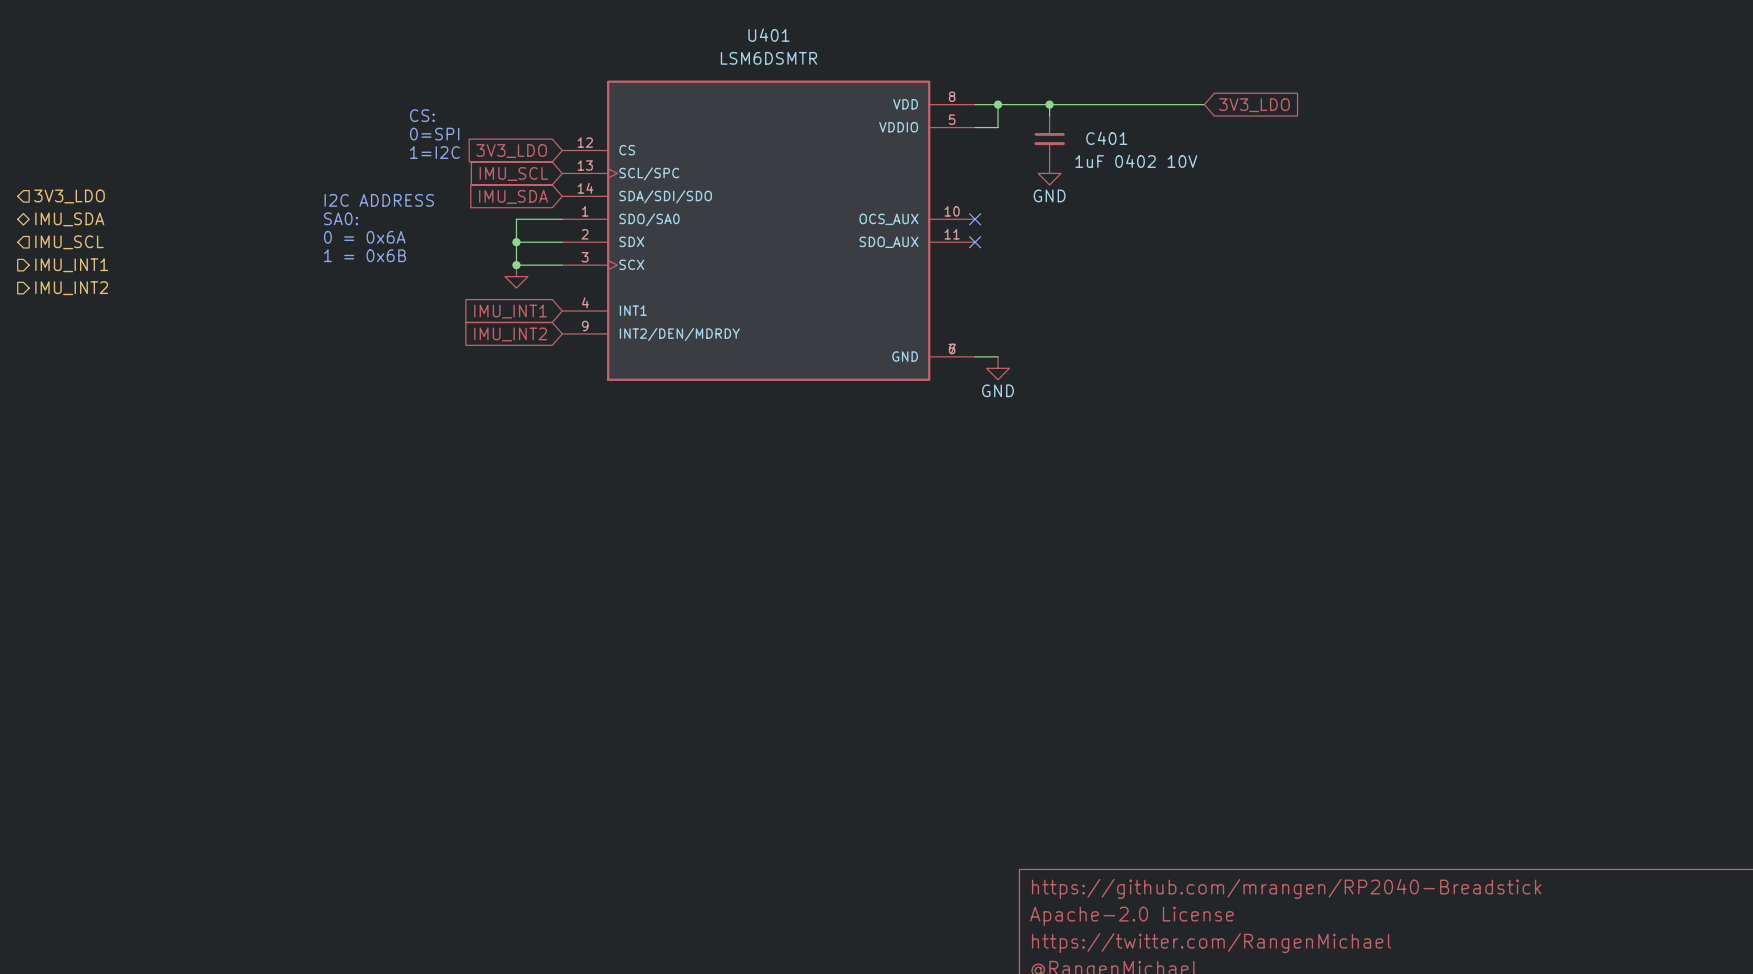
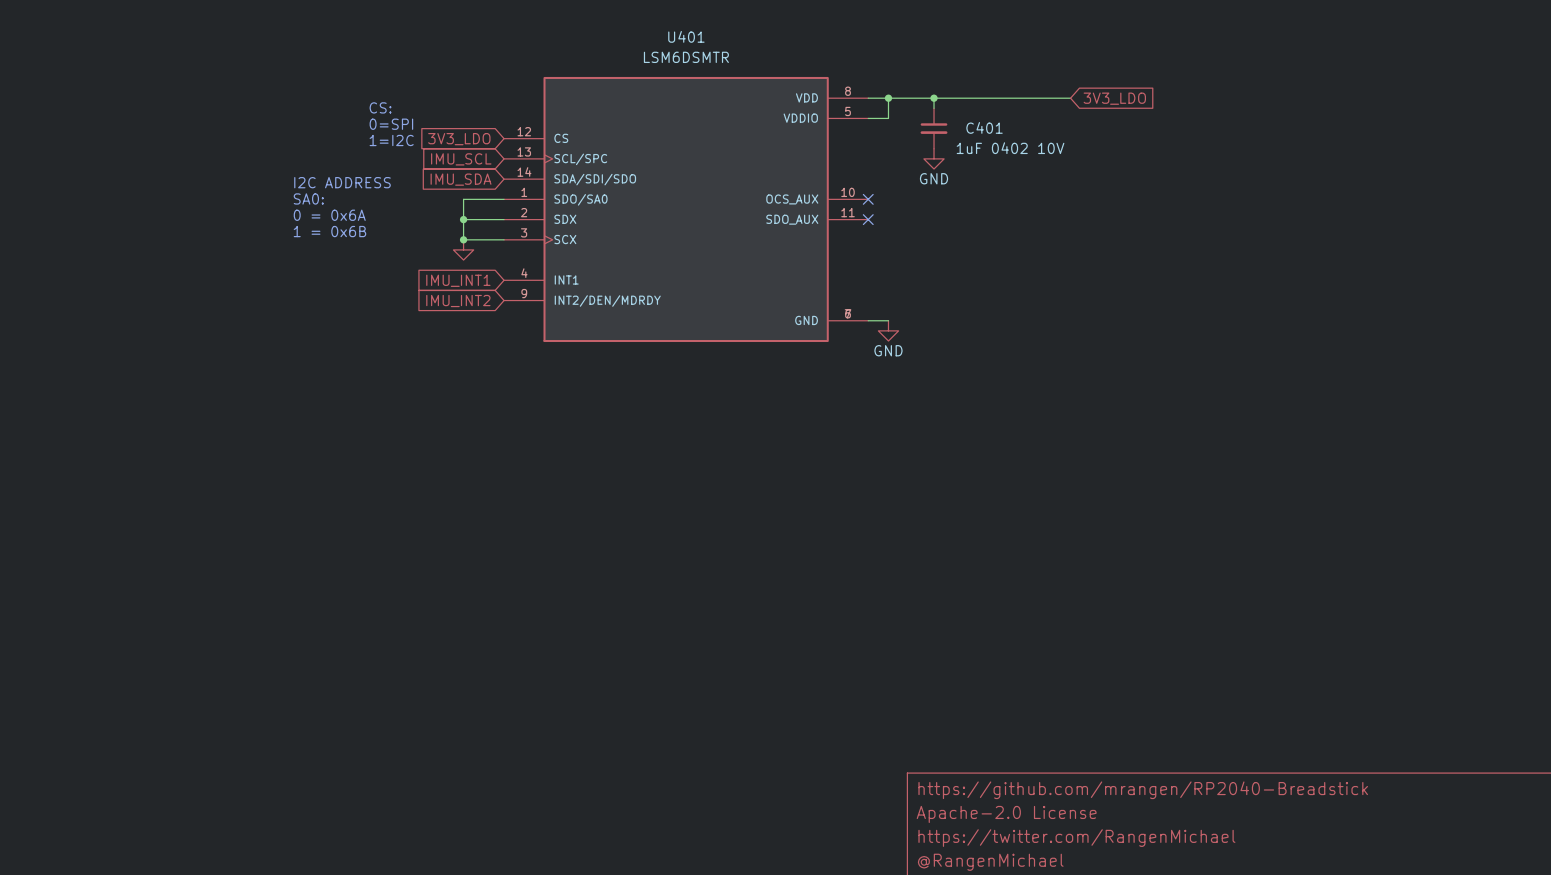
hierarchical label: 3V3_LDO (69, 196) -> none
hierarchical label: IMU_SDA (69, 219) -> none
hierarchical label: IMU_SCL (69, 242) -> none
hierarchical label: IMU_INT1 (71, 265) -> none
hierarchical label: IMU_INT2 (71, 288) -> none

